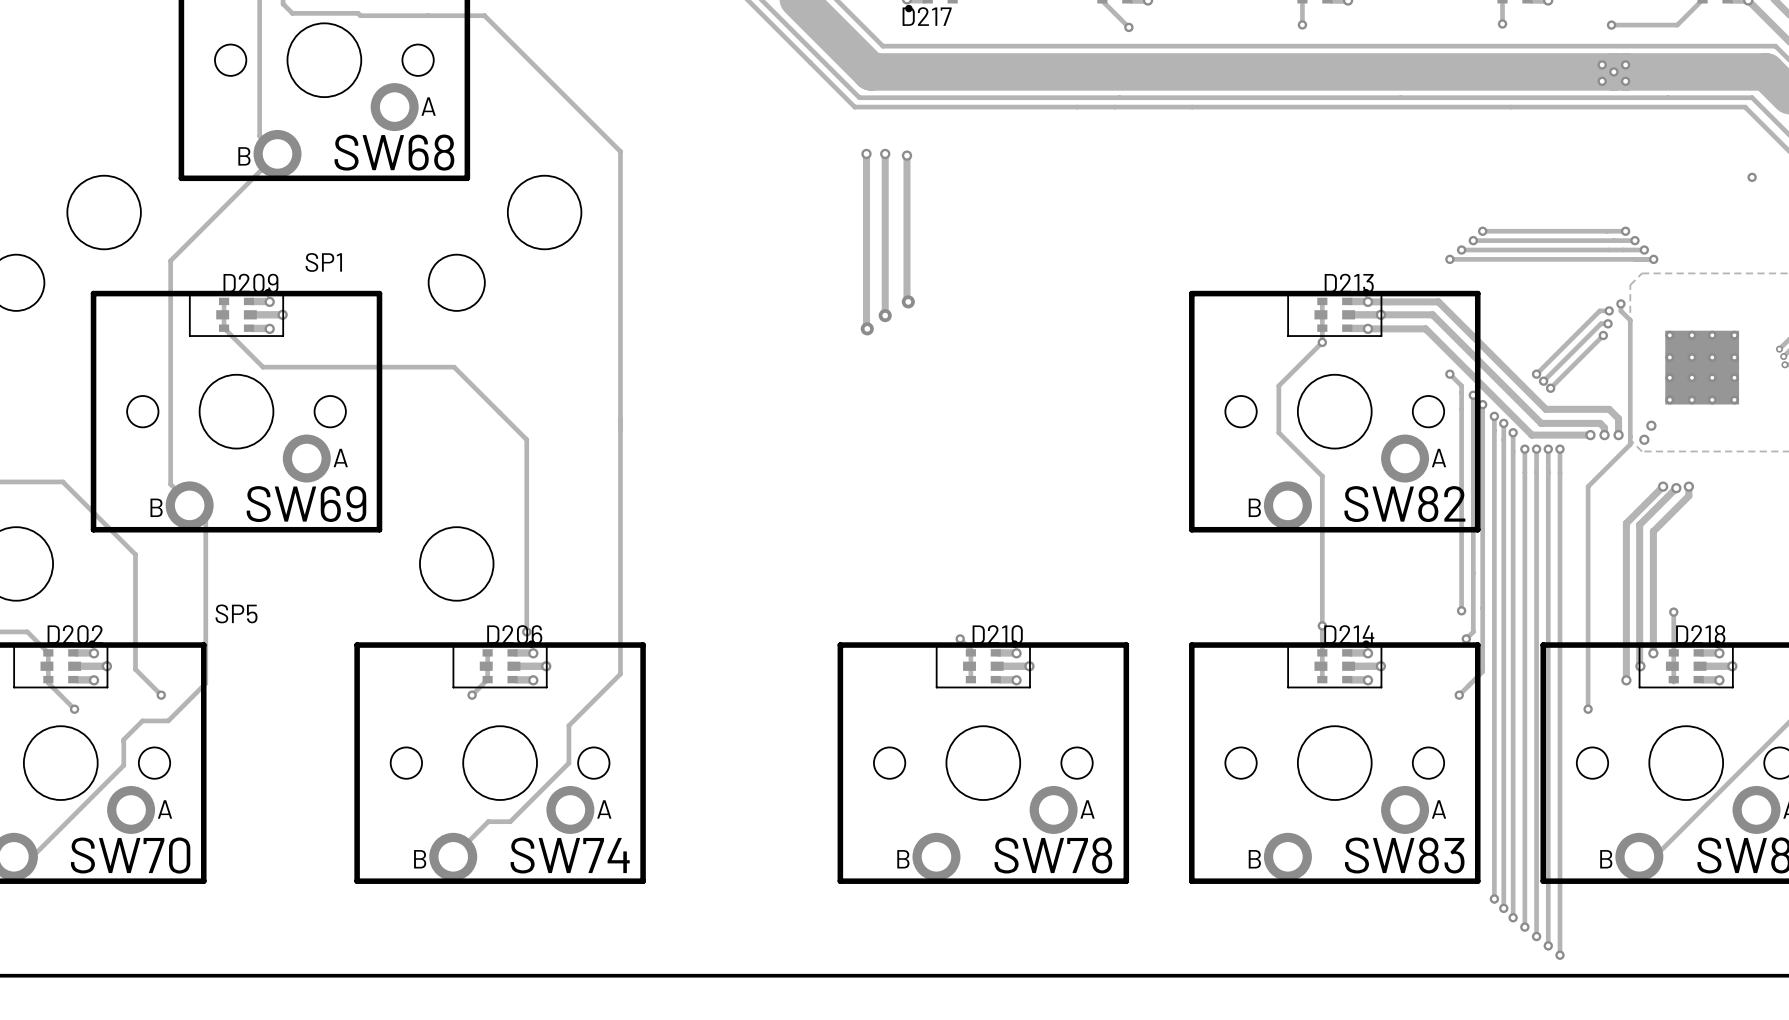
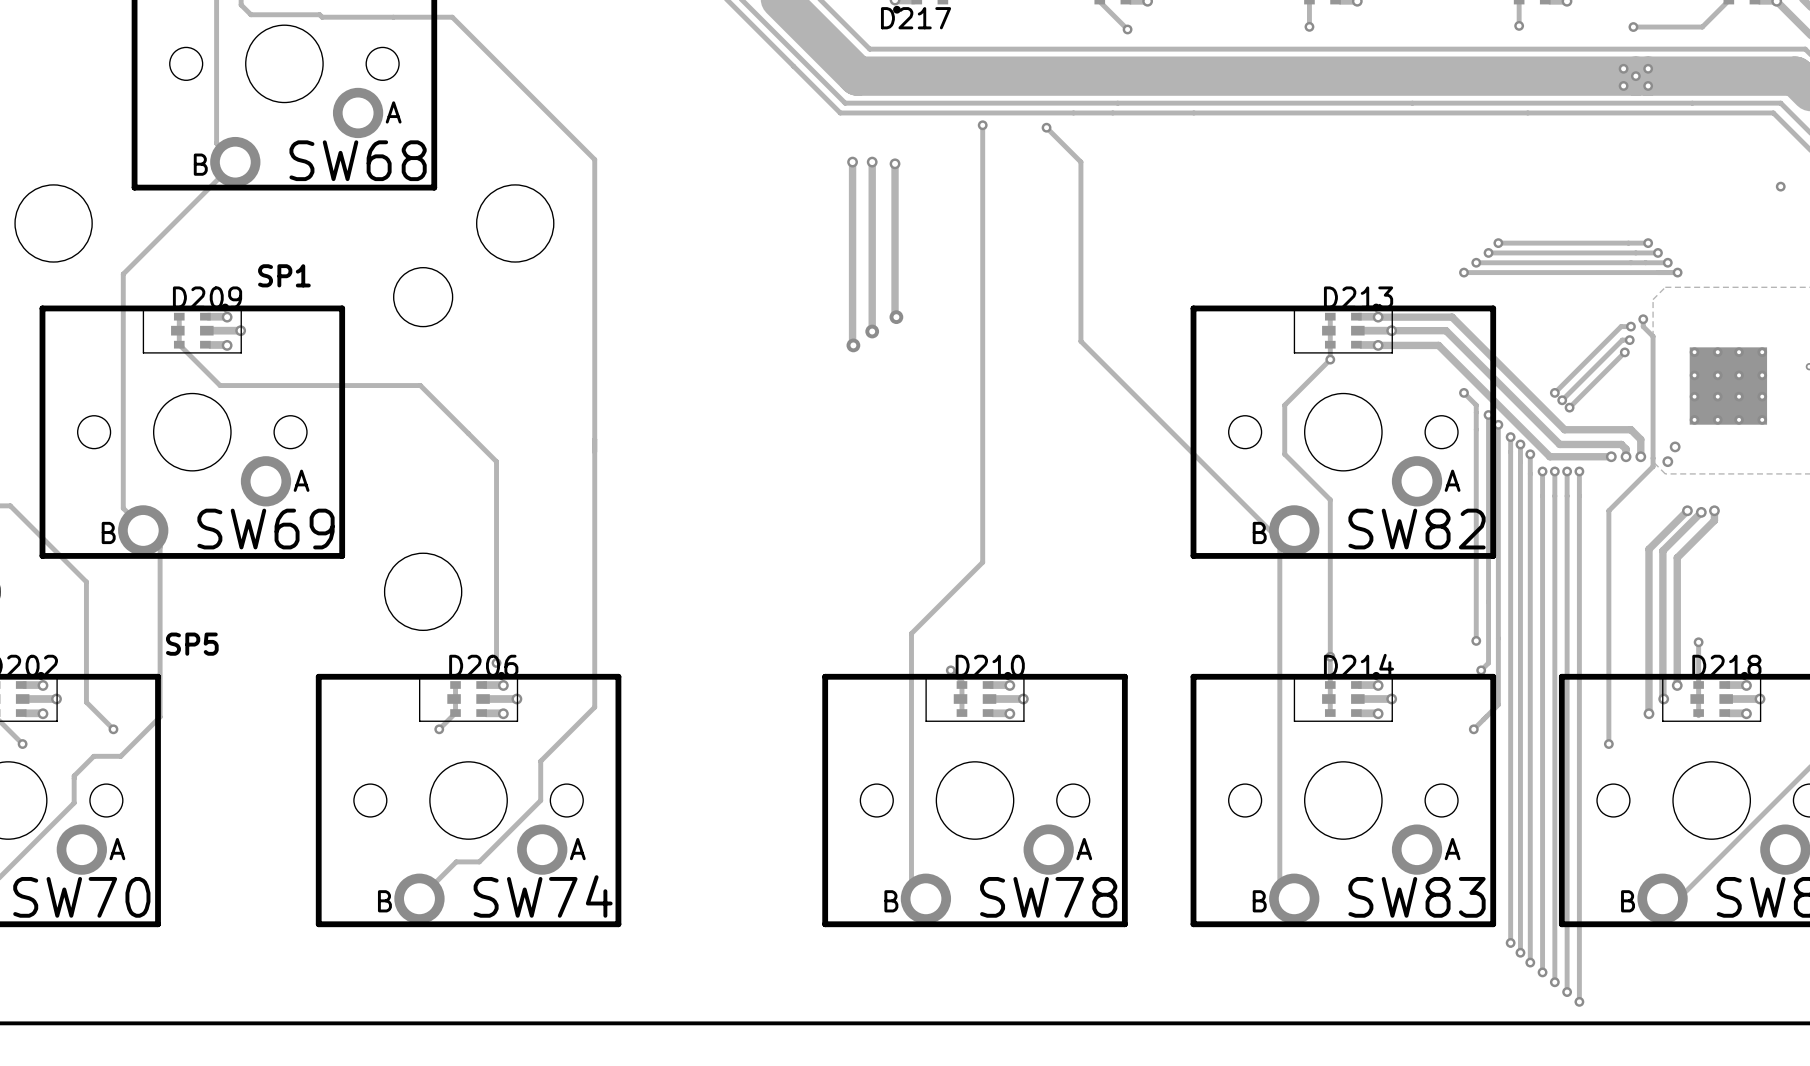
track: none -> (982, 125) (982, 562) (911, 633) (911, 884) (925, 898)
via: none -> (982, 125)
track: none -> (1046, 127) (1080, 162) (1080, 341) (1270, 530) (1294, 530) (1279, 544) (1279, 884) (1294, 898)
via: none -> (1046, 127)

